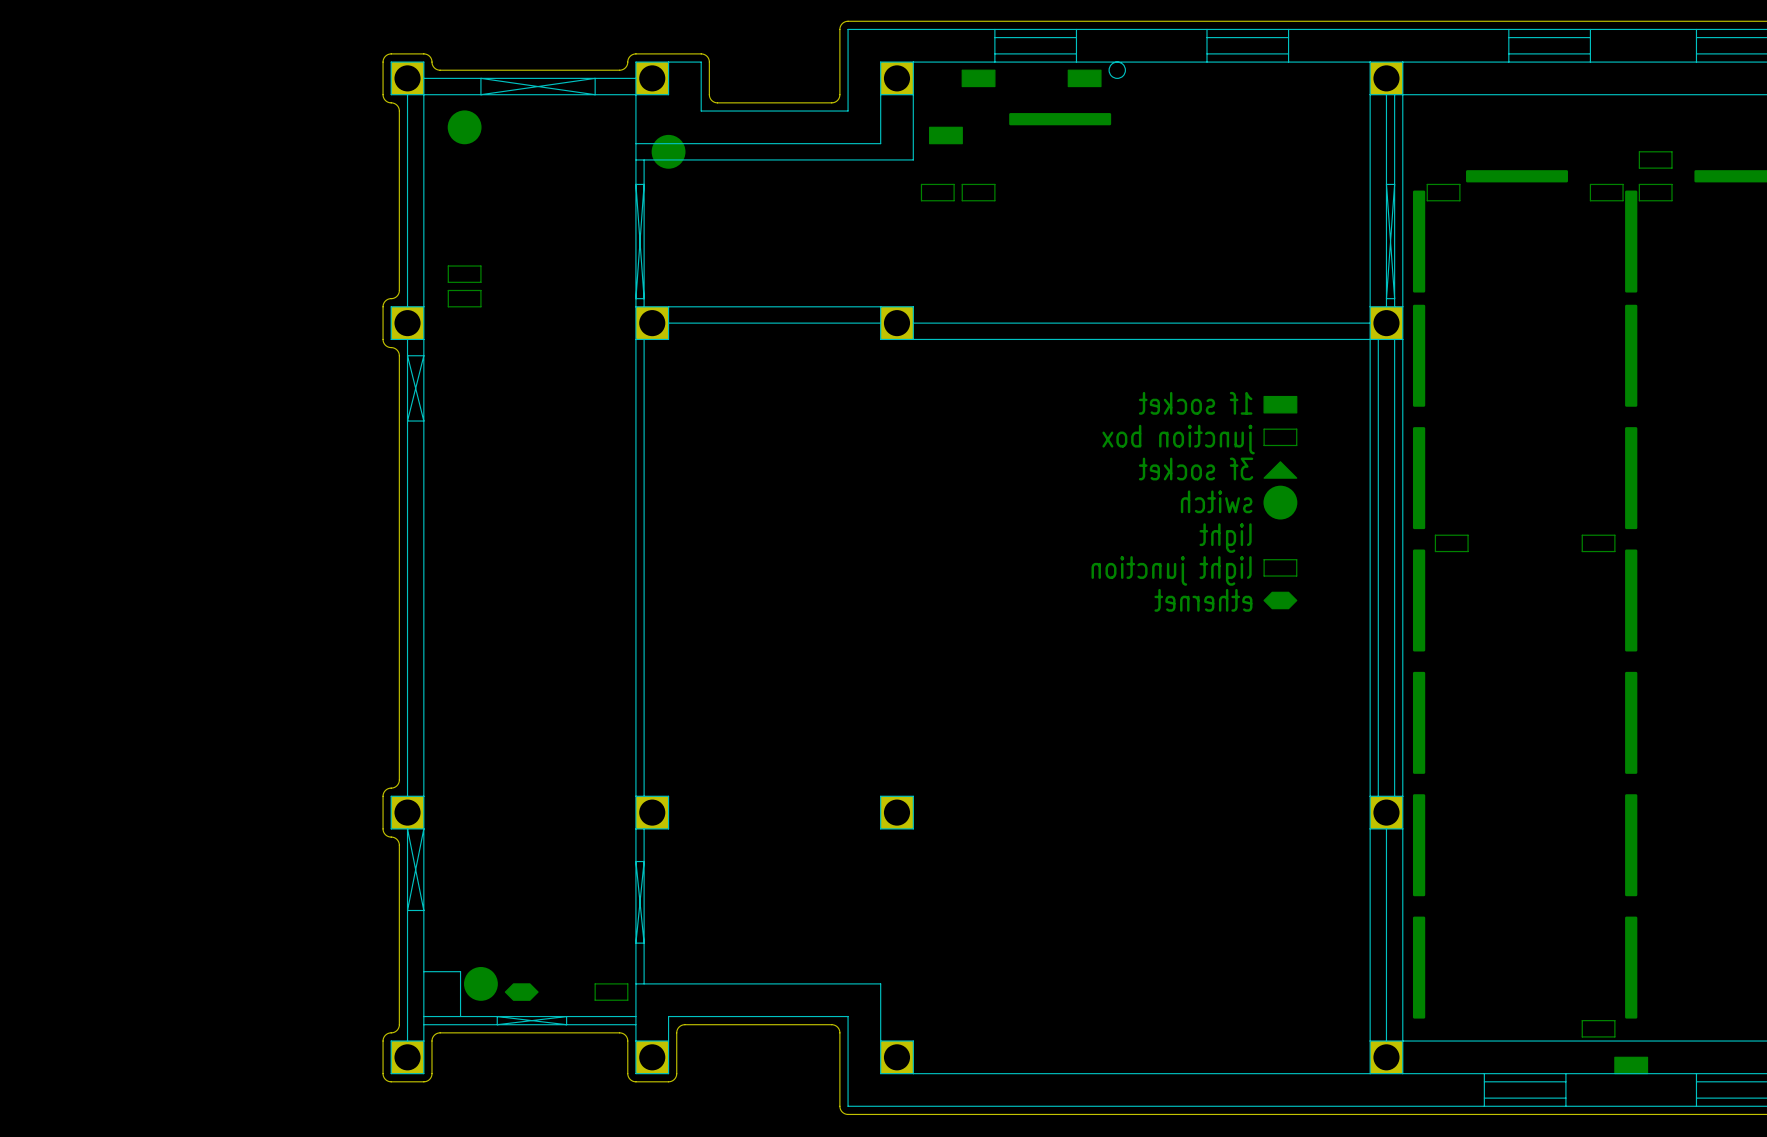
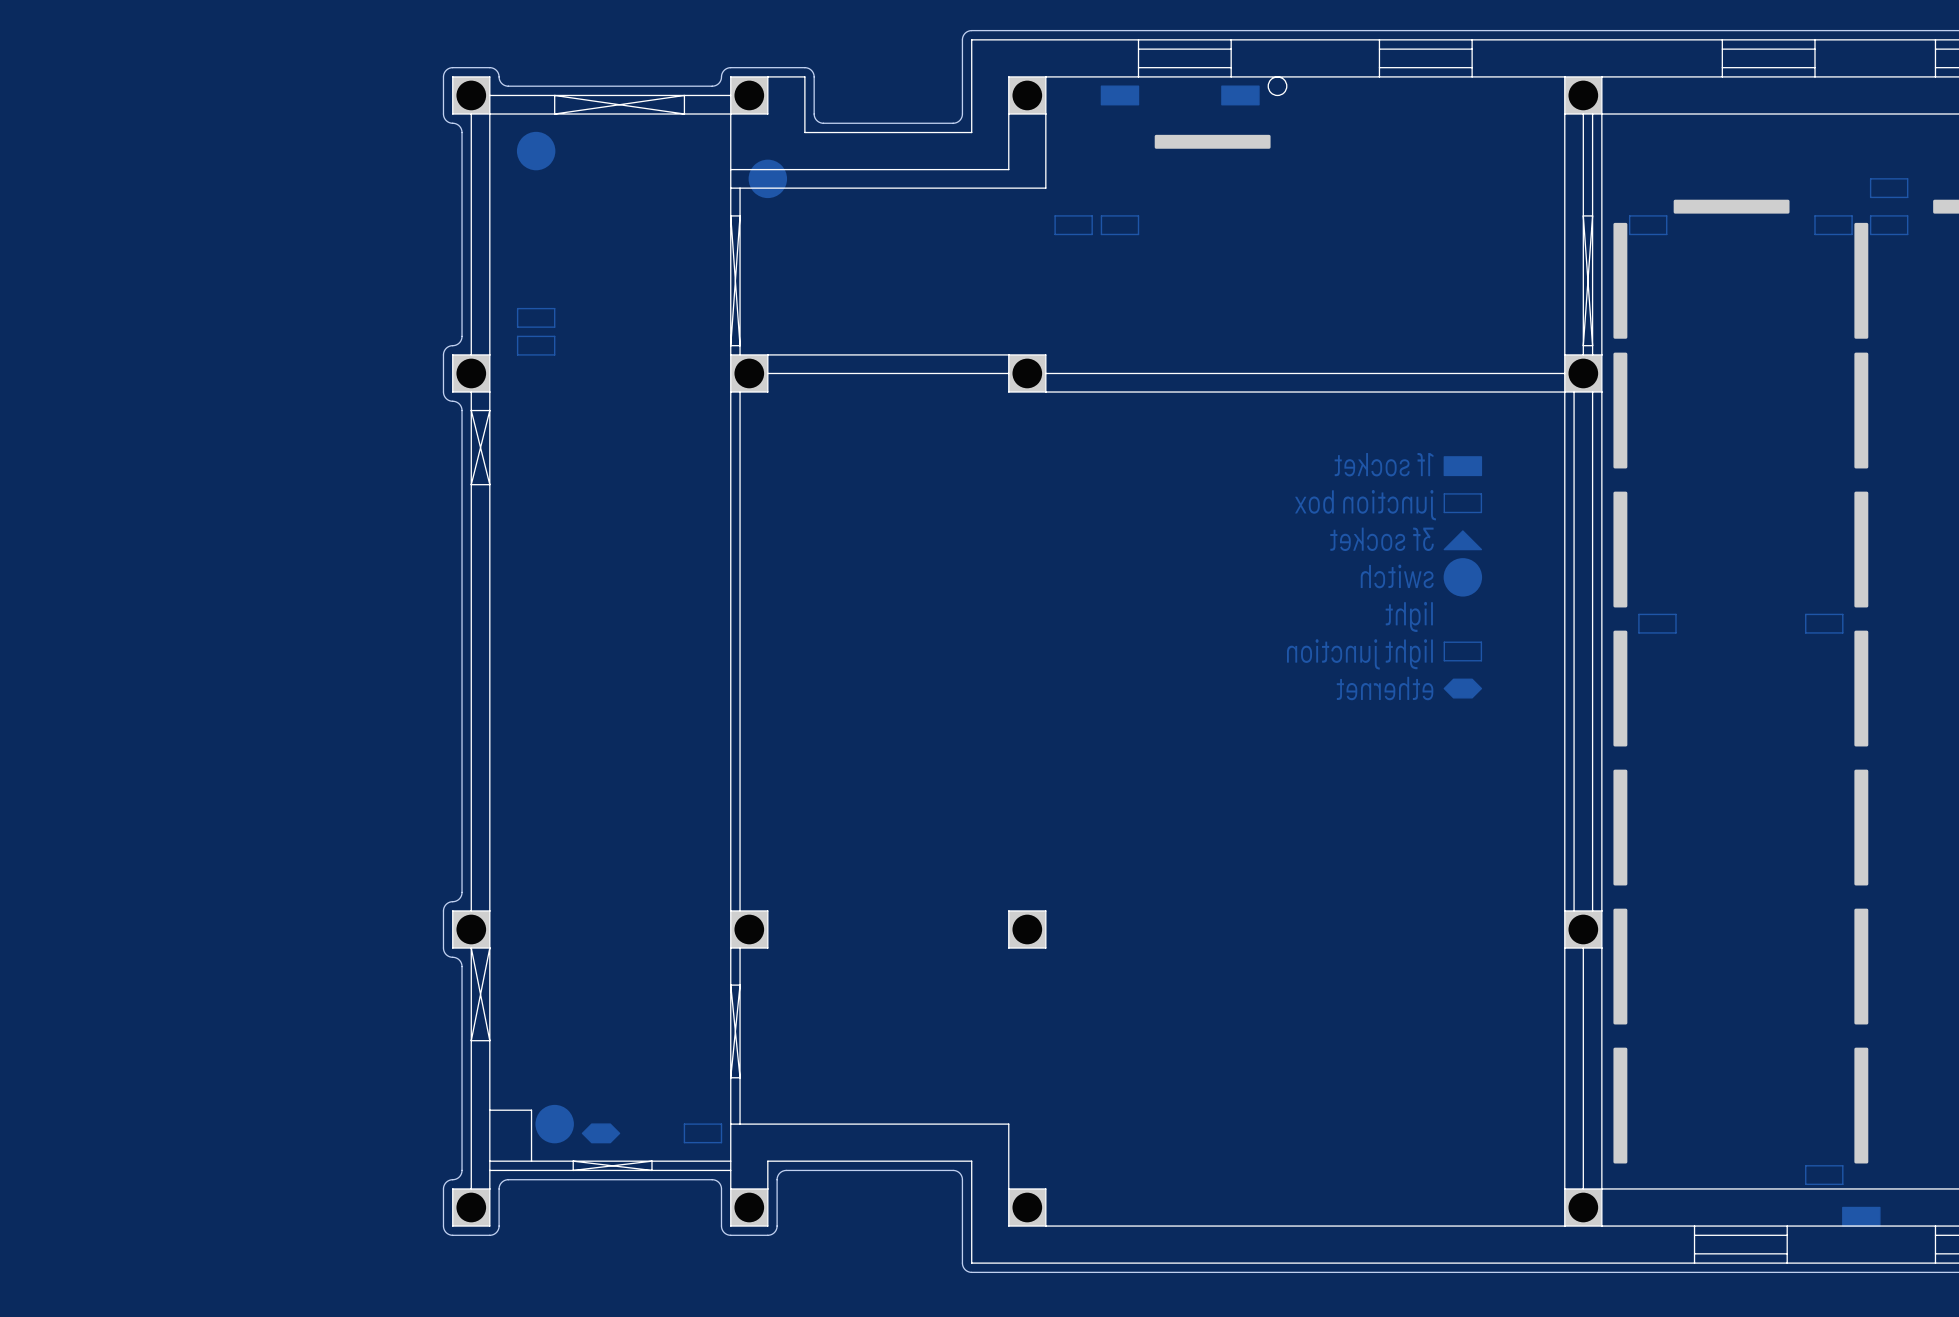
drawing: [929, 126, 963, 145] -> none

